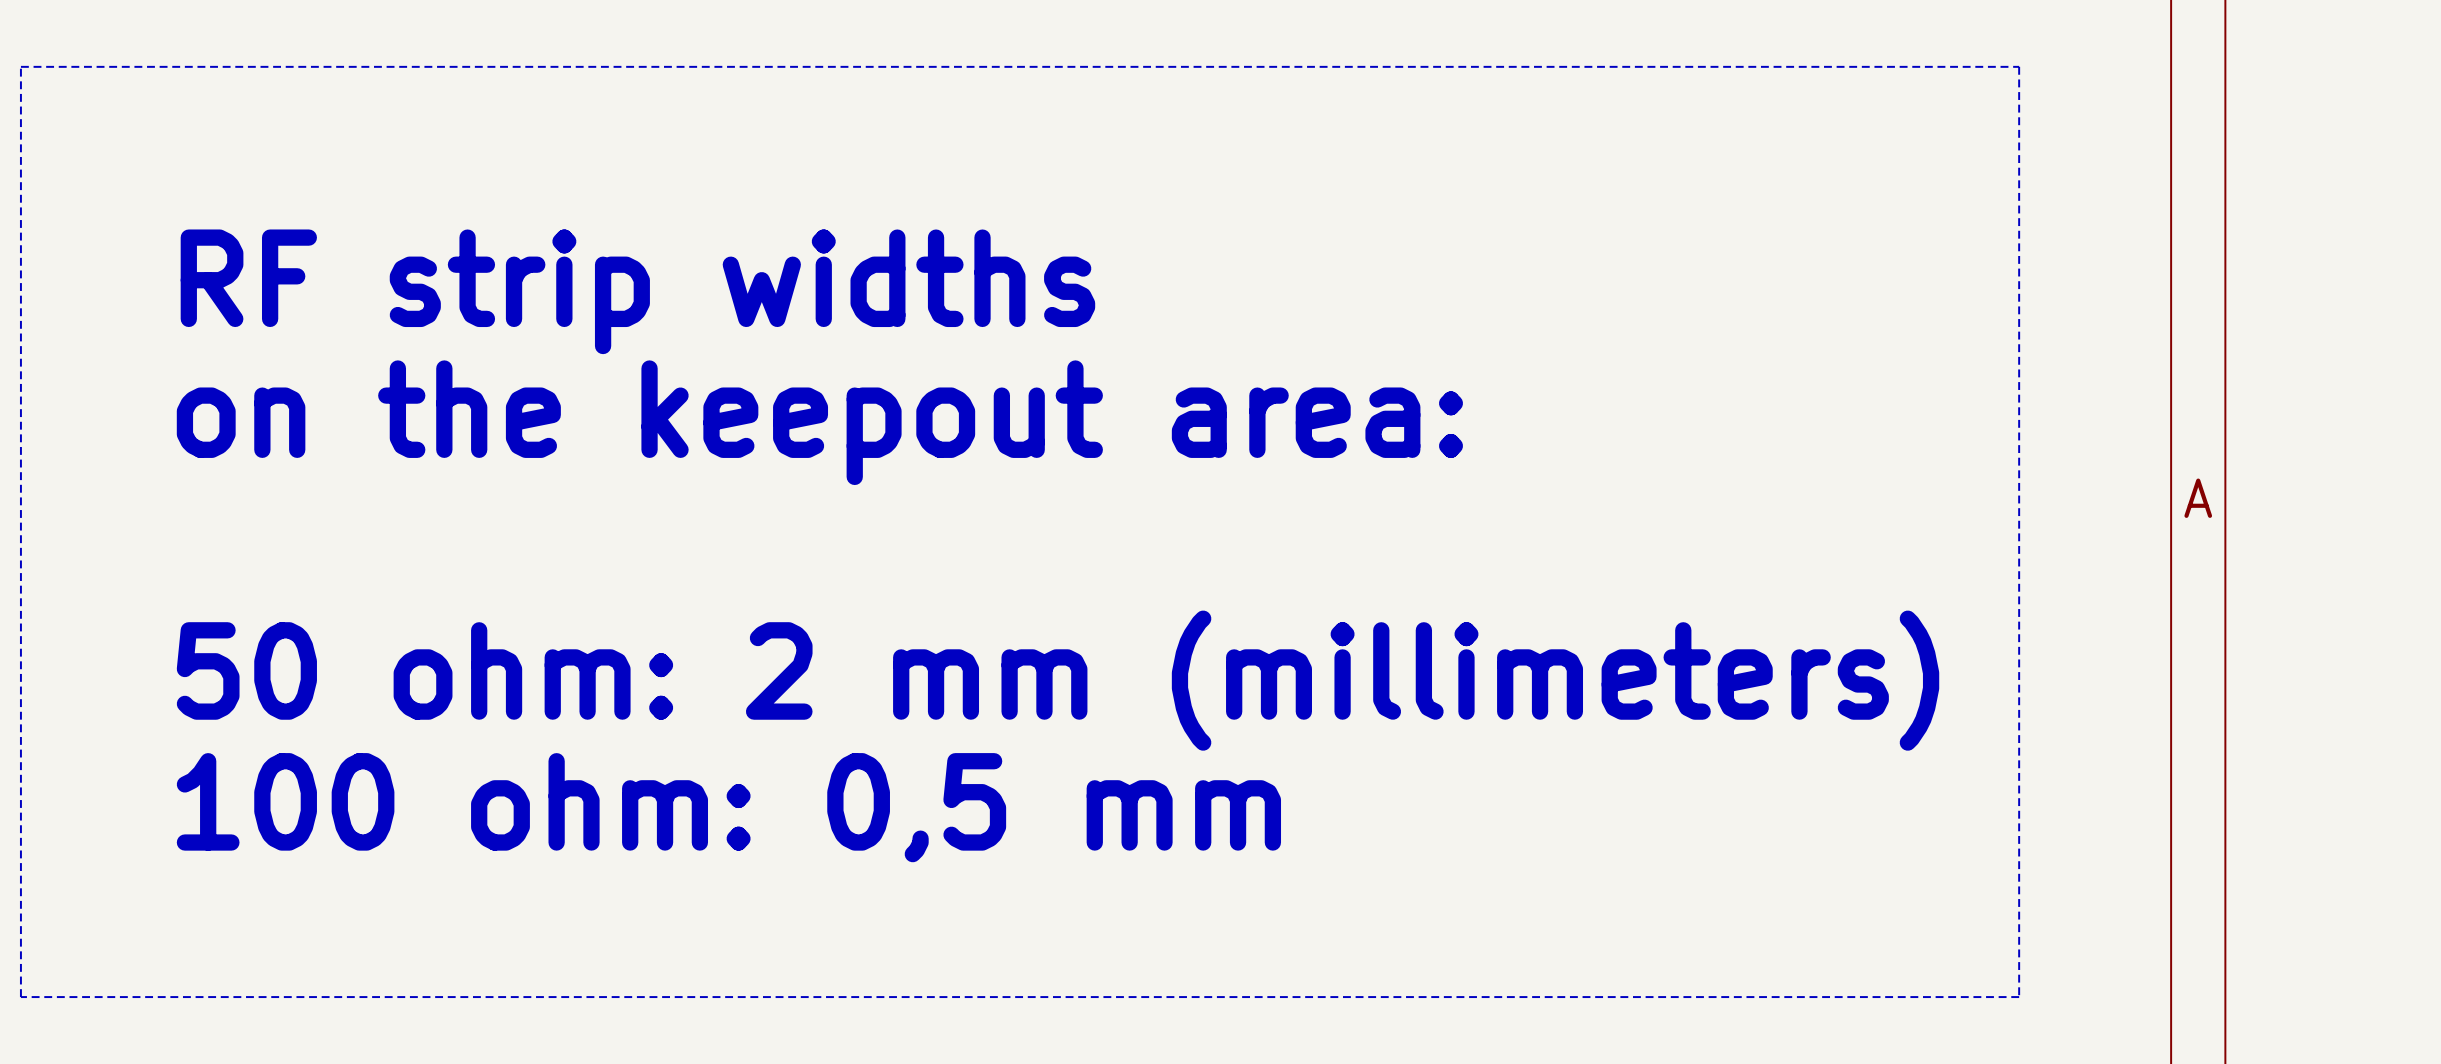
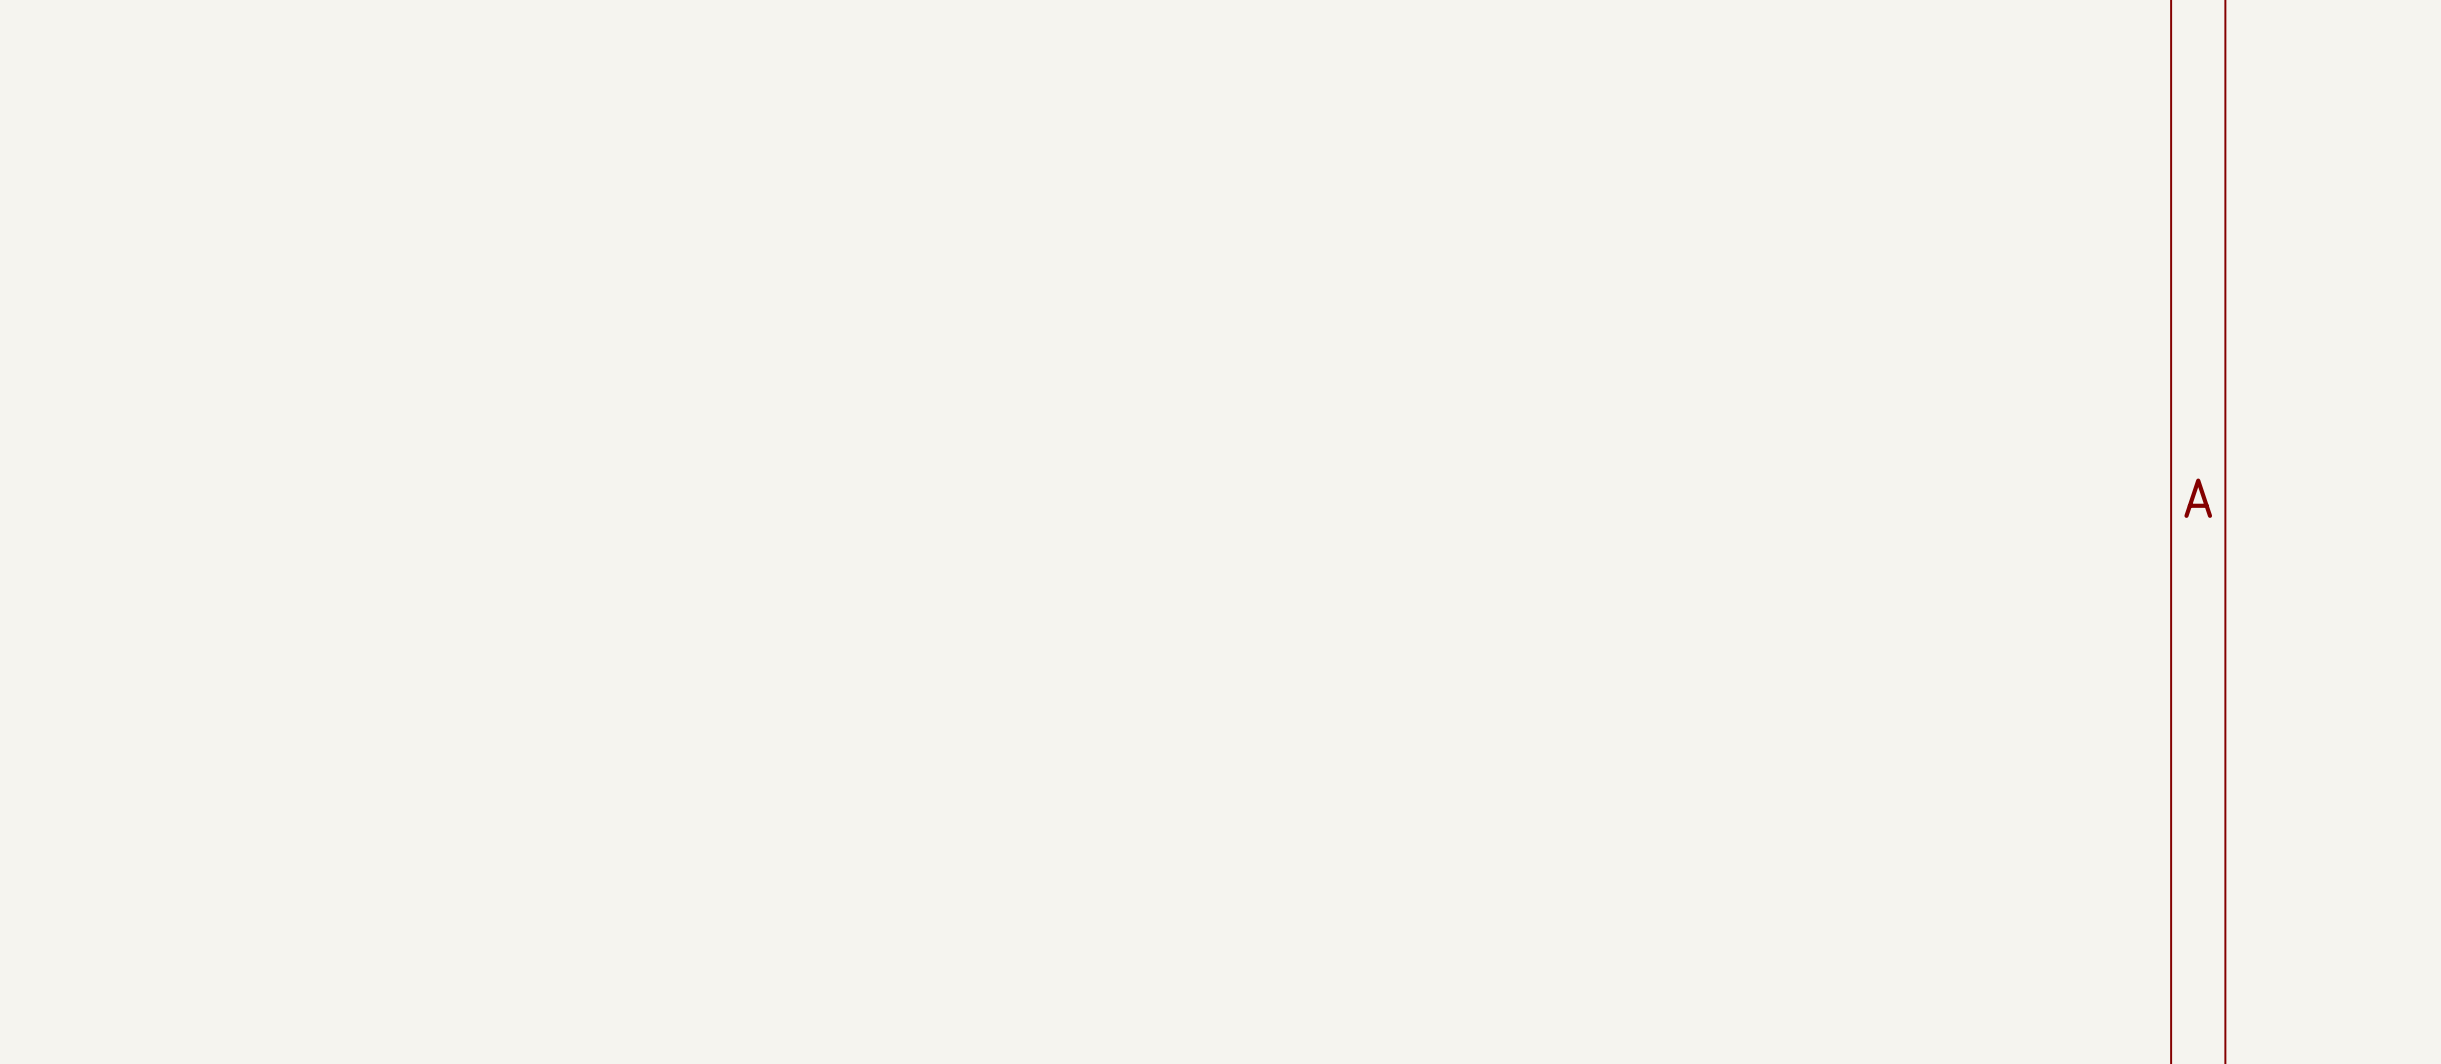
line: (20, 66) (2019, 66) (2019, 997) (20, 997) (20, 66) -> none
text: RF strip widths (637, 291) -> none
text: on the keepout area: (819, 422) -> none
text: 50 ohm: 2 mm (millimeters) (1058, 680) -> none
text: 100 ohm: 0,5 mm (728, 807) -> none

